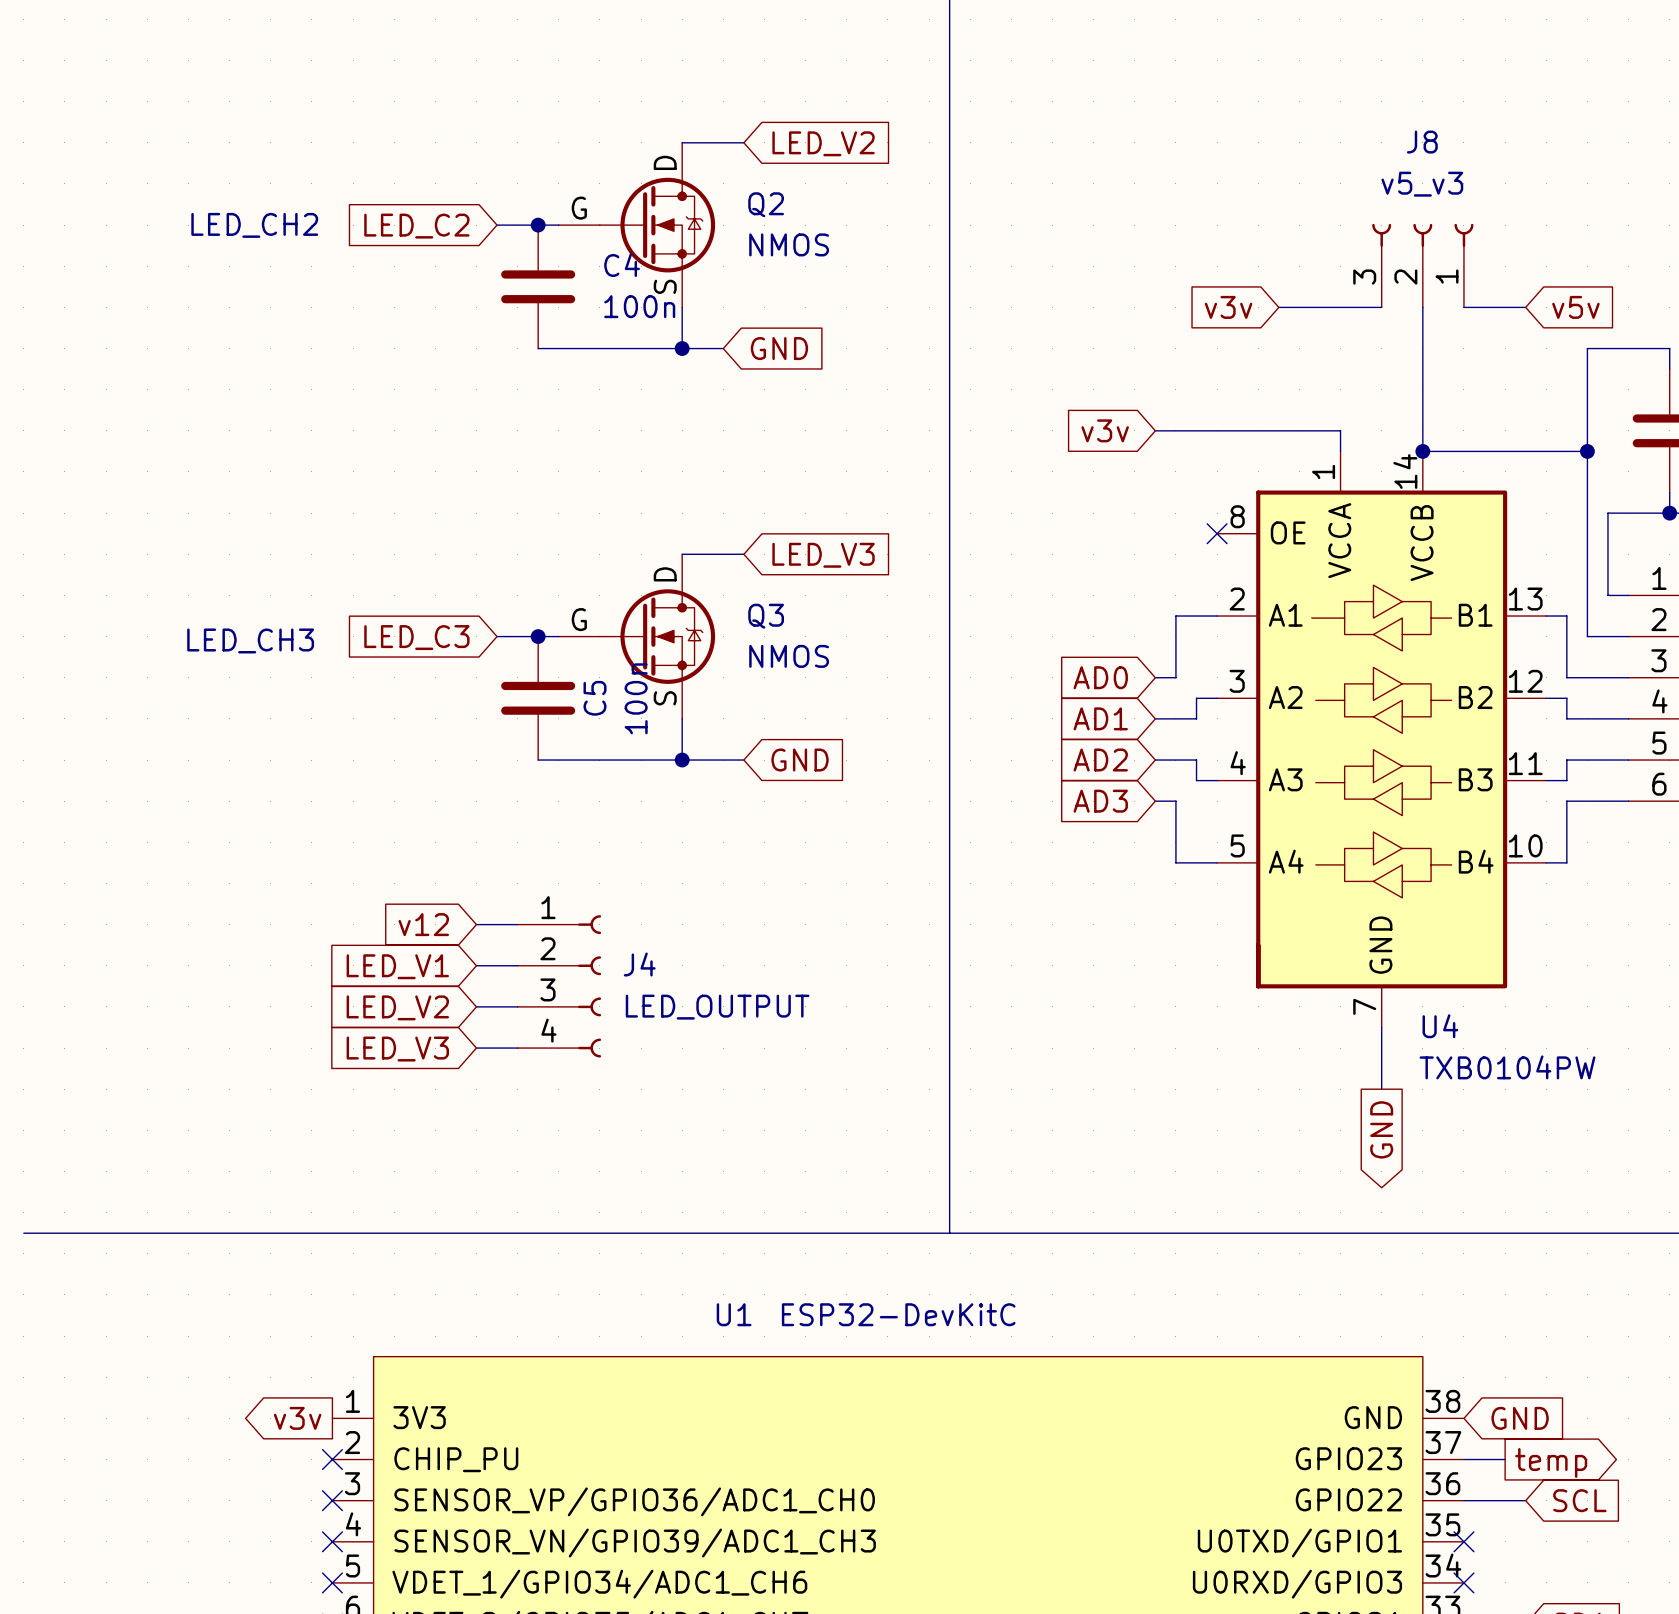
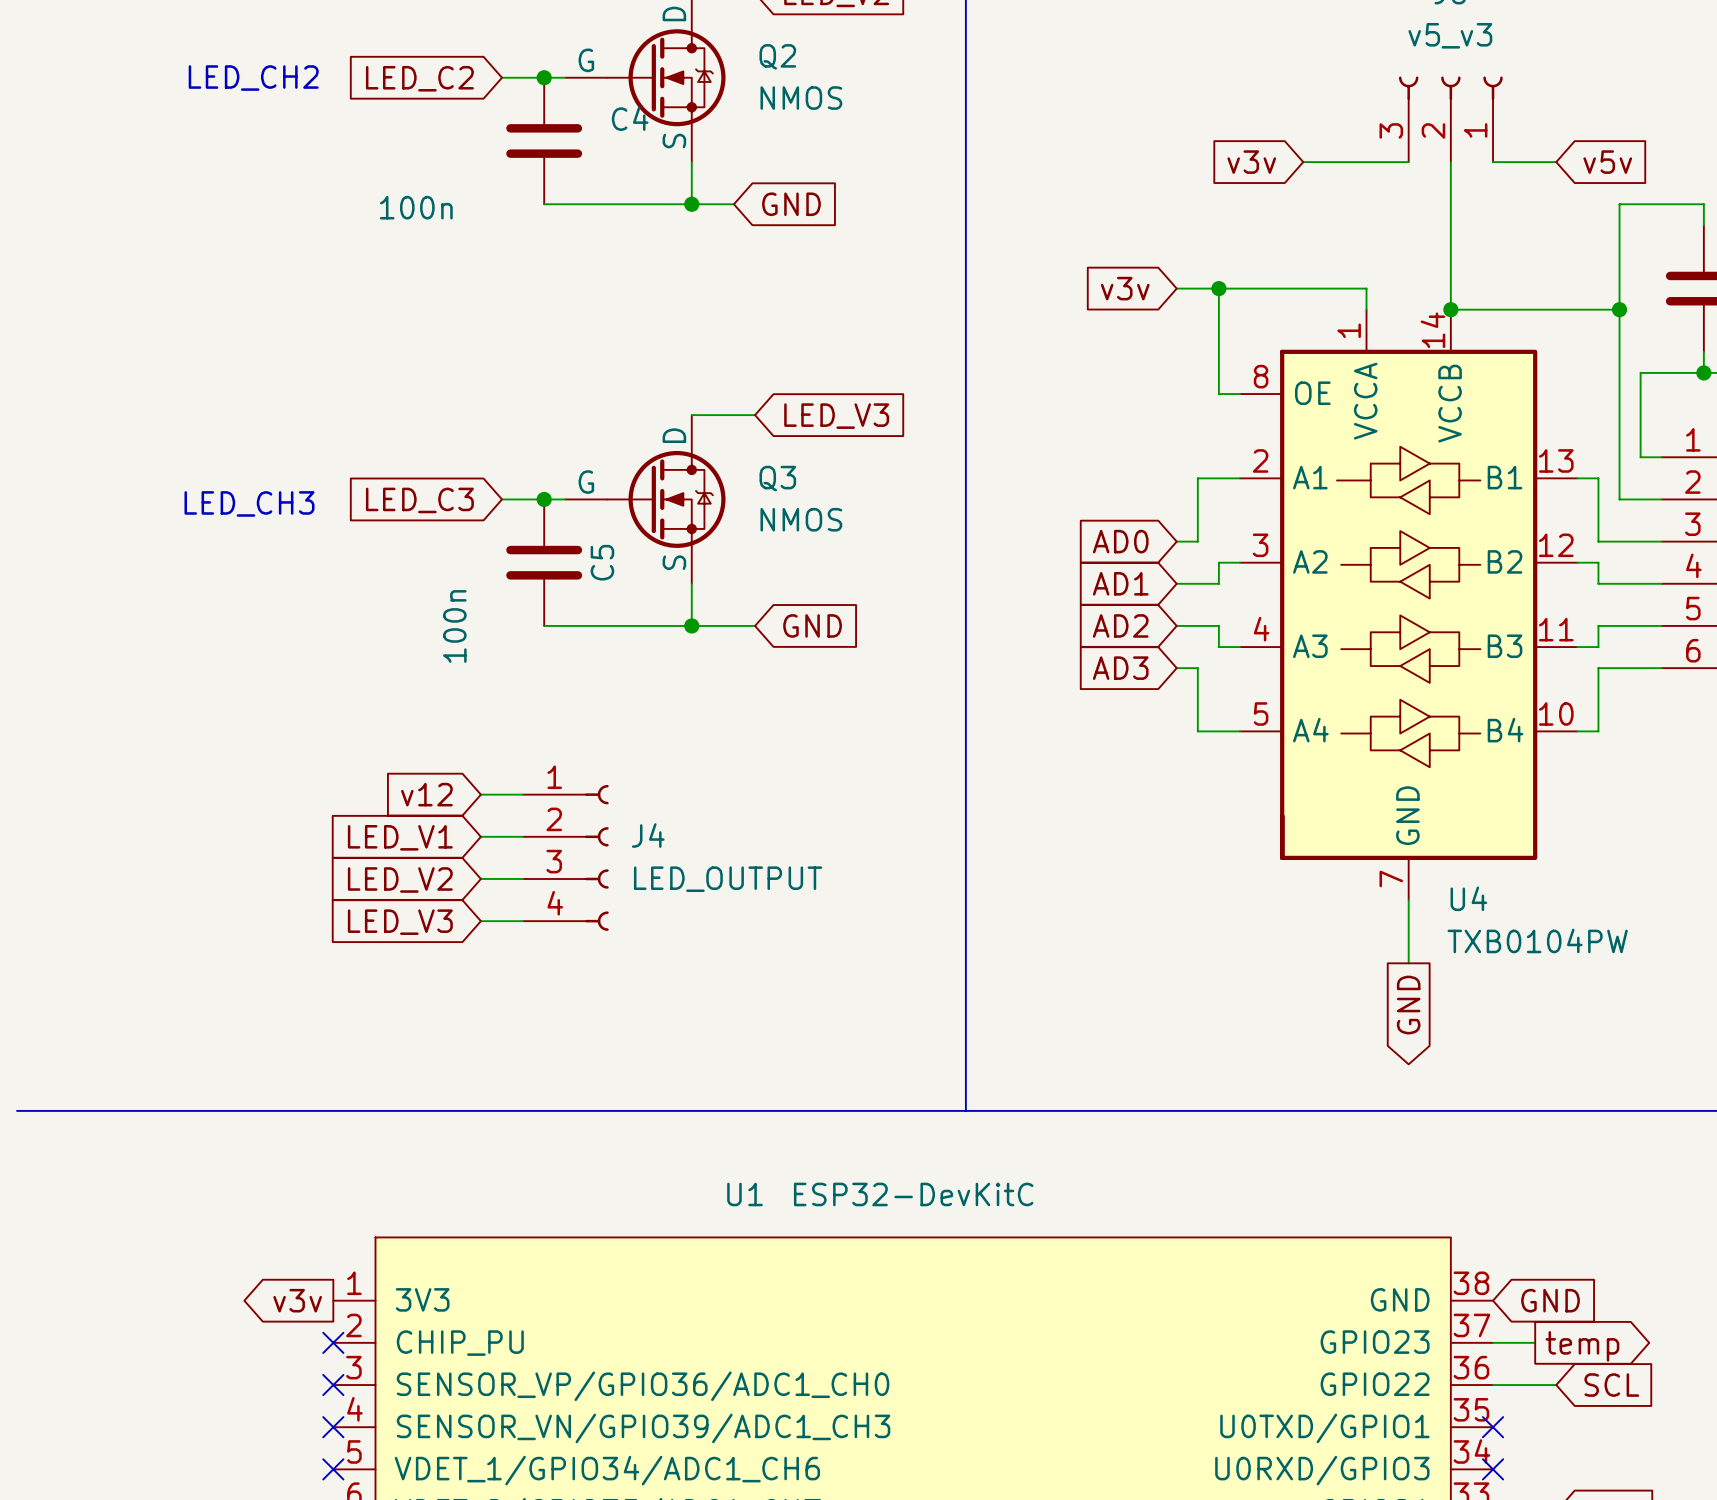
C4 value position: 100n (639, 306) -> 100n (416, 207)
wire: none -> (1218, 288) (1218, 394) (1240, 394)
junction: none -> (1218, 288)
no-connect mark: (1217, 533) -> none
C5 value position: 100n (636, 698) -> 100n (454, 626)

